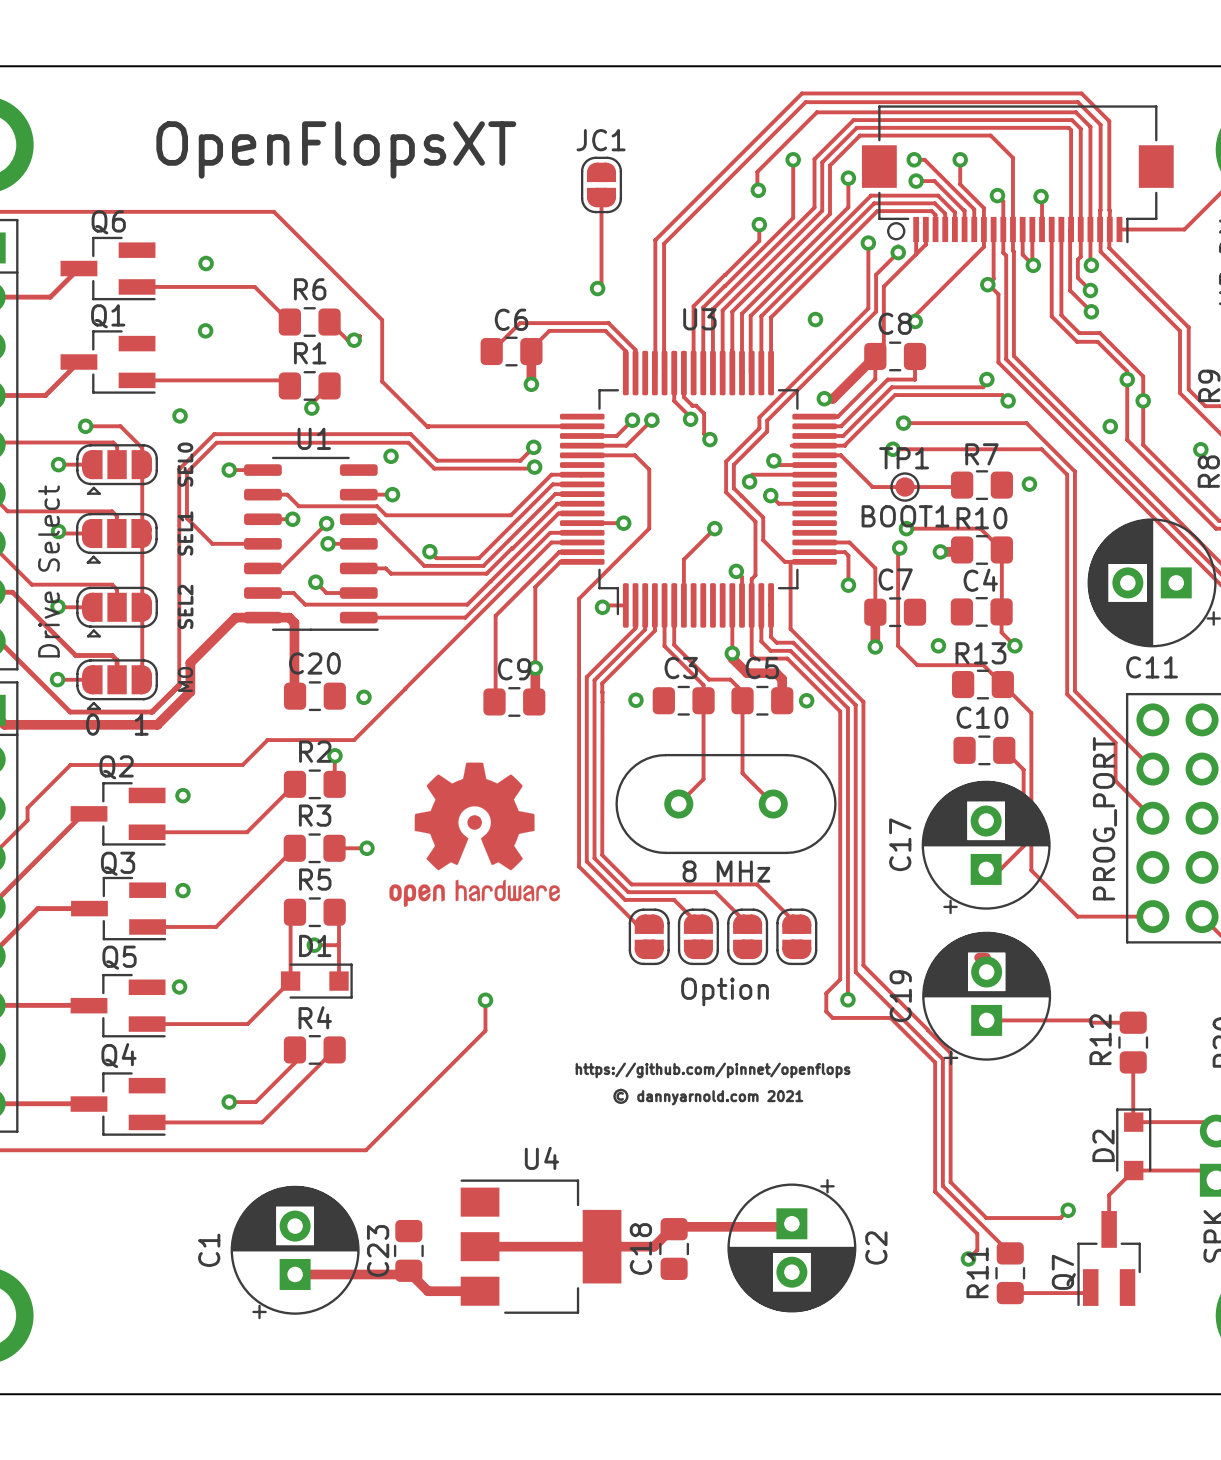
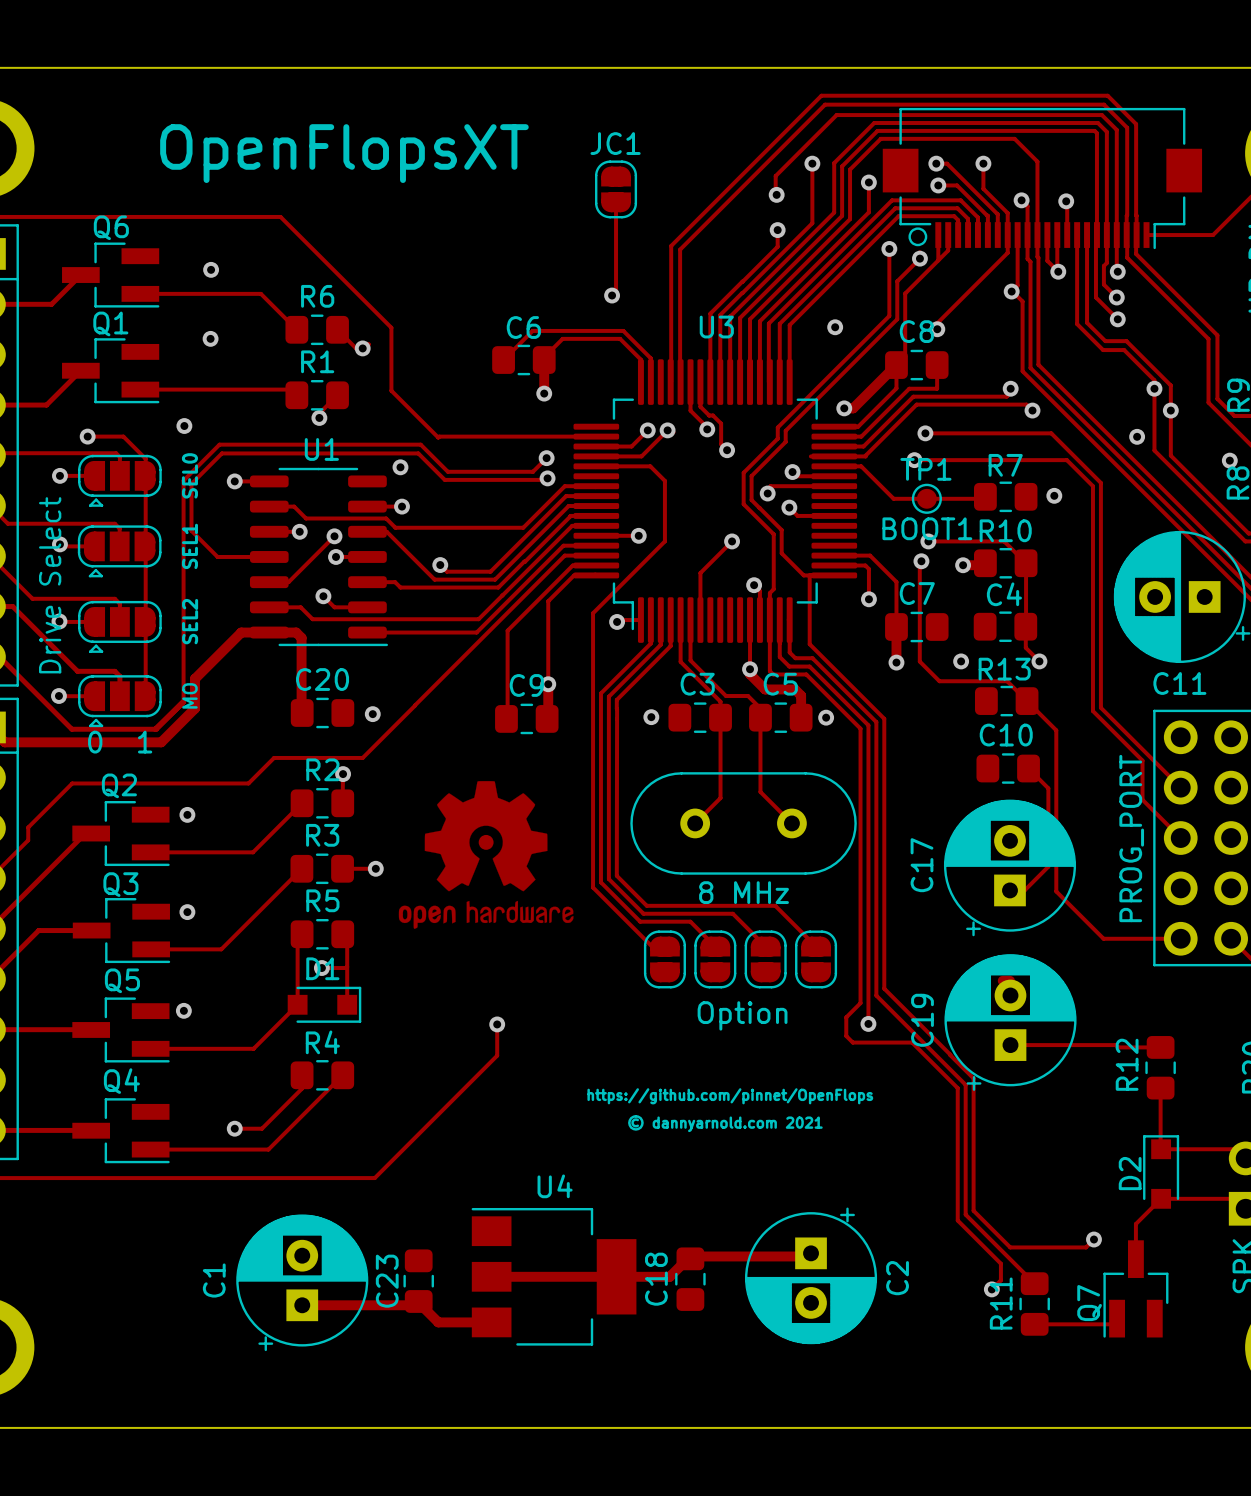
text: https://github.com/pinnet/openflops (713, 1070) -> https://github.com/pinnet/OpenFlops (730, 1096)

